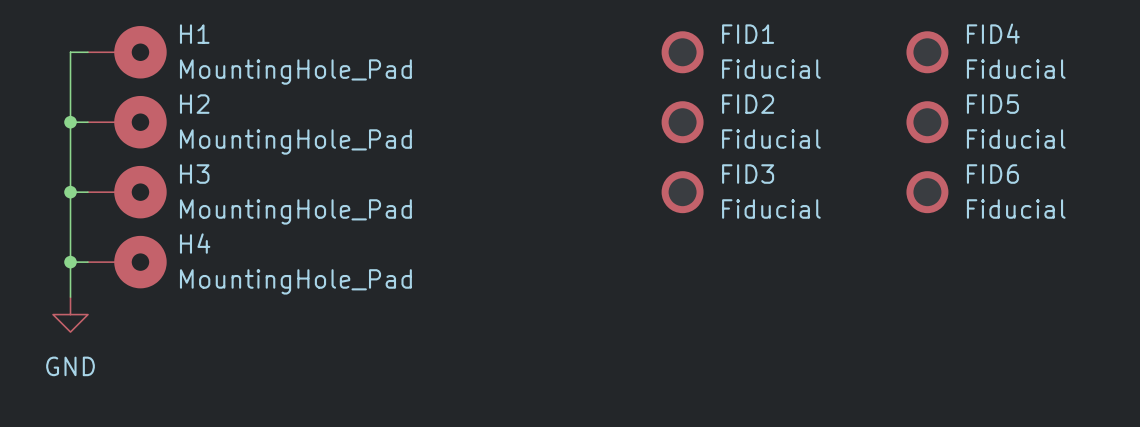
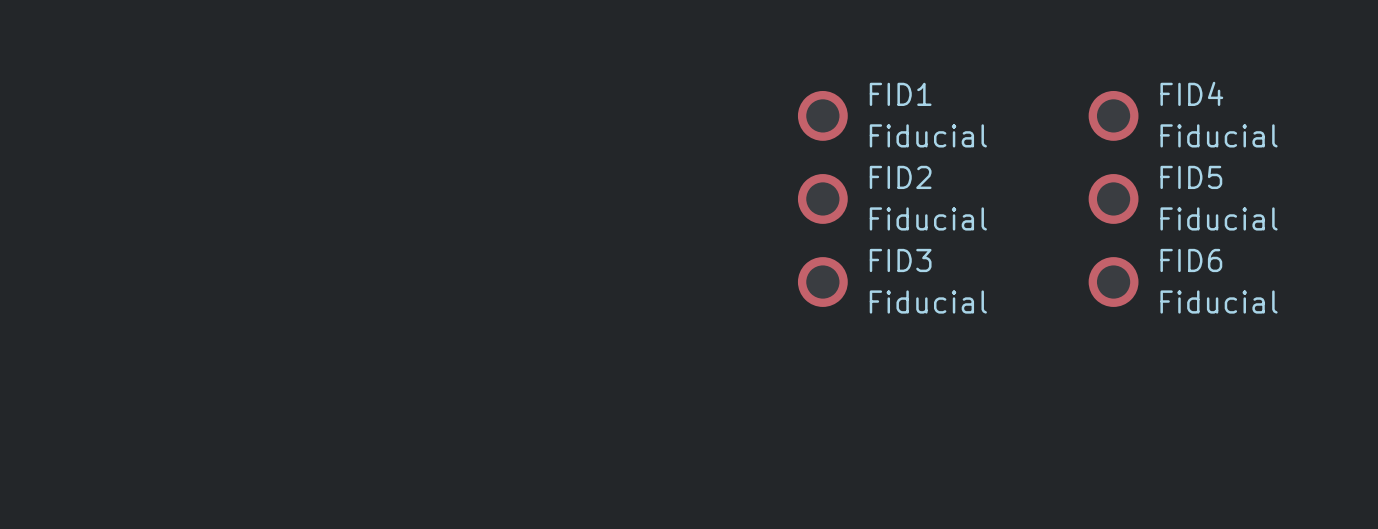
wire: (87, 52) (70, 52) (70, 297) -> none
H1: MountingHole_Pad (127, 52) -> none
wire: (70, 122) (87, 122) -> none
junction: (70, 122) -> none
H2: MountingHole_Pad (127, 122) -> none
wire: (70, 192) (87, 192) -> none
junction: (70, 192) -> none
H3: MountingHole_Pad (127, 192) -> none
wire: (70, 262) (87, 262) -> none
junction: (70, 262) -> none
H4: MountingHole_Pad (127, 262) -> none
power symbol: GND (70, 314) -> none

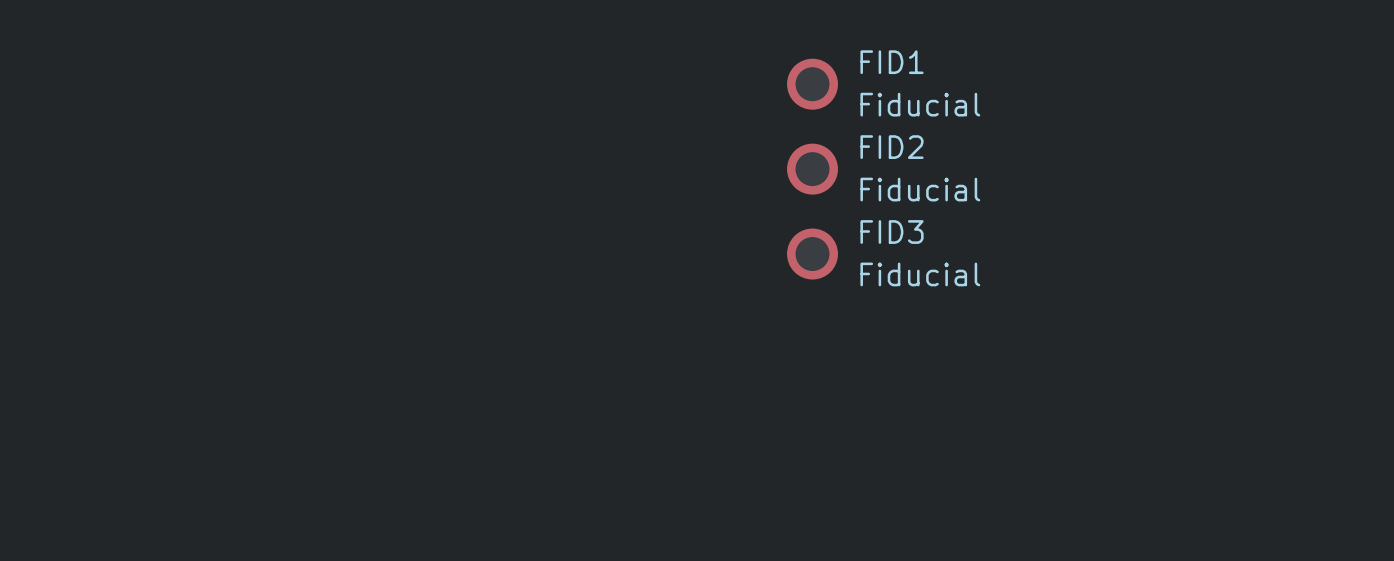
FID4: Fiducial (1113, 115) -> none
FID5: Fiducial (1113, 198) -> none
FID6: Fiducial (1113, 282) -> none

